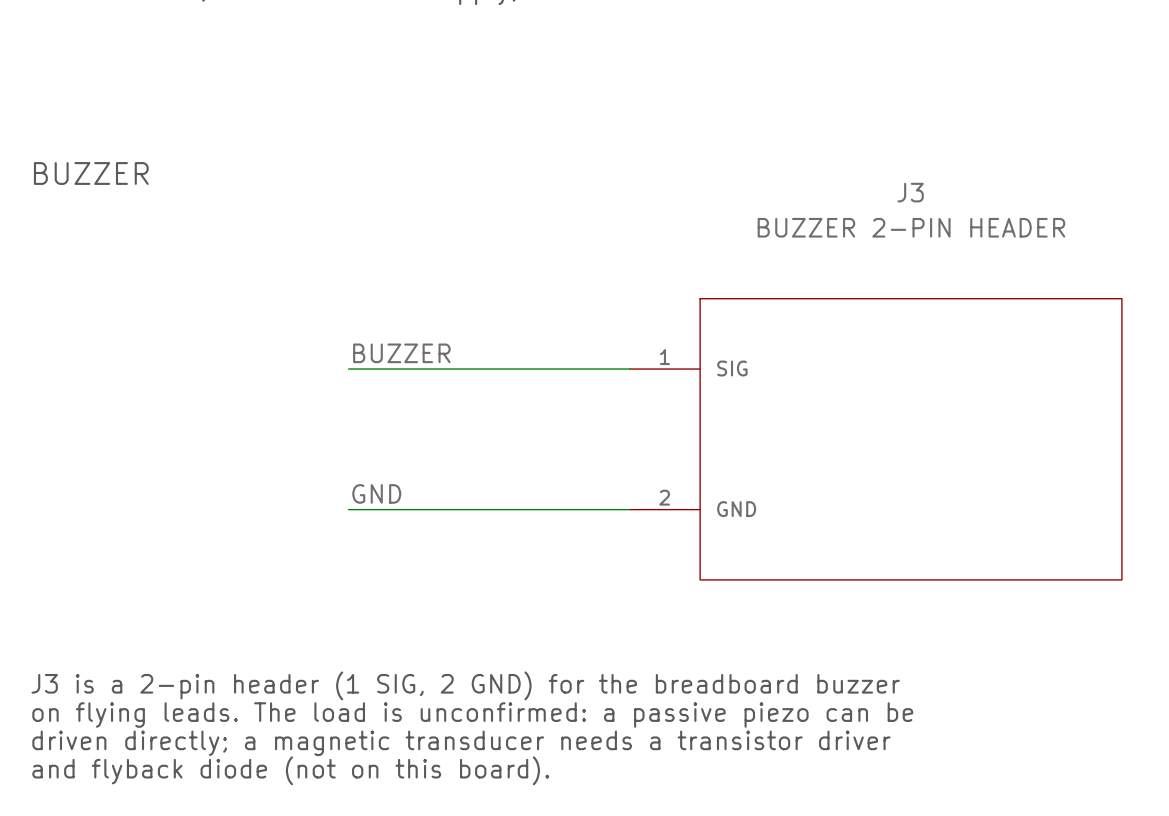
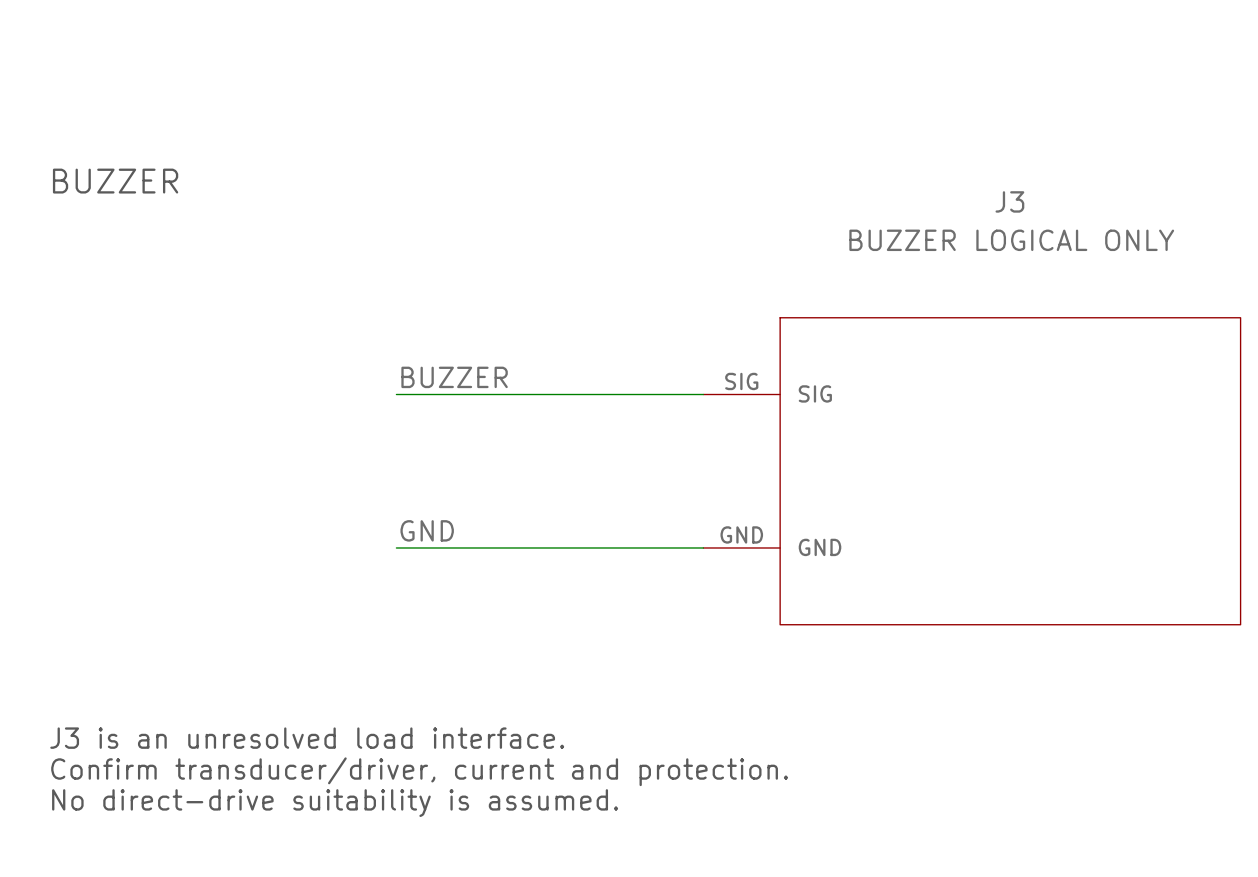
J3 value: BUZZER 2-PIN HEADER (911, 227) -> BUZZER LOGICAL ONLY (1011, 240)
J3 pin number: 1 (664, 357) -> SIG (741, 381)
J3 pin number: 2 (664, 497) -> GND (741, 534)
text: J3 is a 2-pin header (1 SIG, 2 GND) for the breadboard buzzer (465, 685) -> J3 is an unresolved load interface. (307, 738)
text: on flying leads. The load is unconfirmed: a passive piezo can be (472, 715) -> Confirm transducer/driver, current and protection. (419, 771)
text: driven directly; a magnetic transducer needs a transistor driver (461, 743) -> No direct-drive suitability is assumed. (335, 803)
text: and flyback diode (not on this board). (290, 770) -> none

